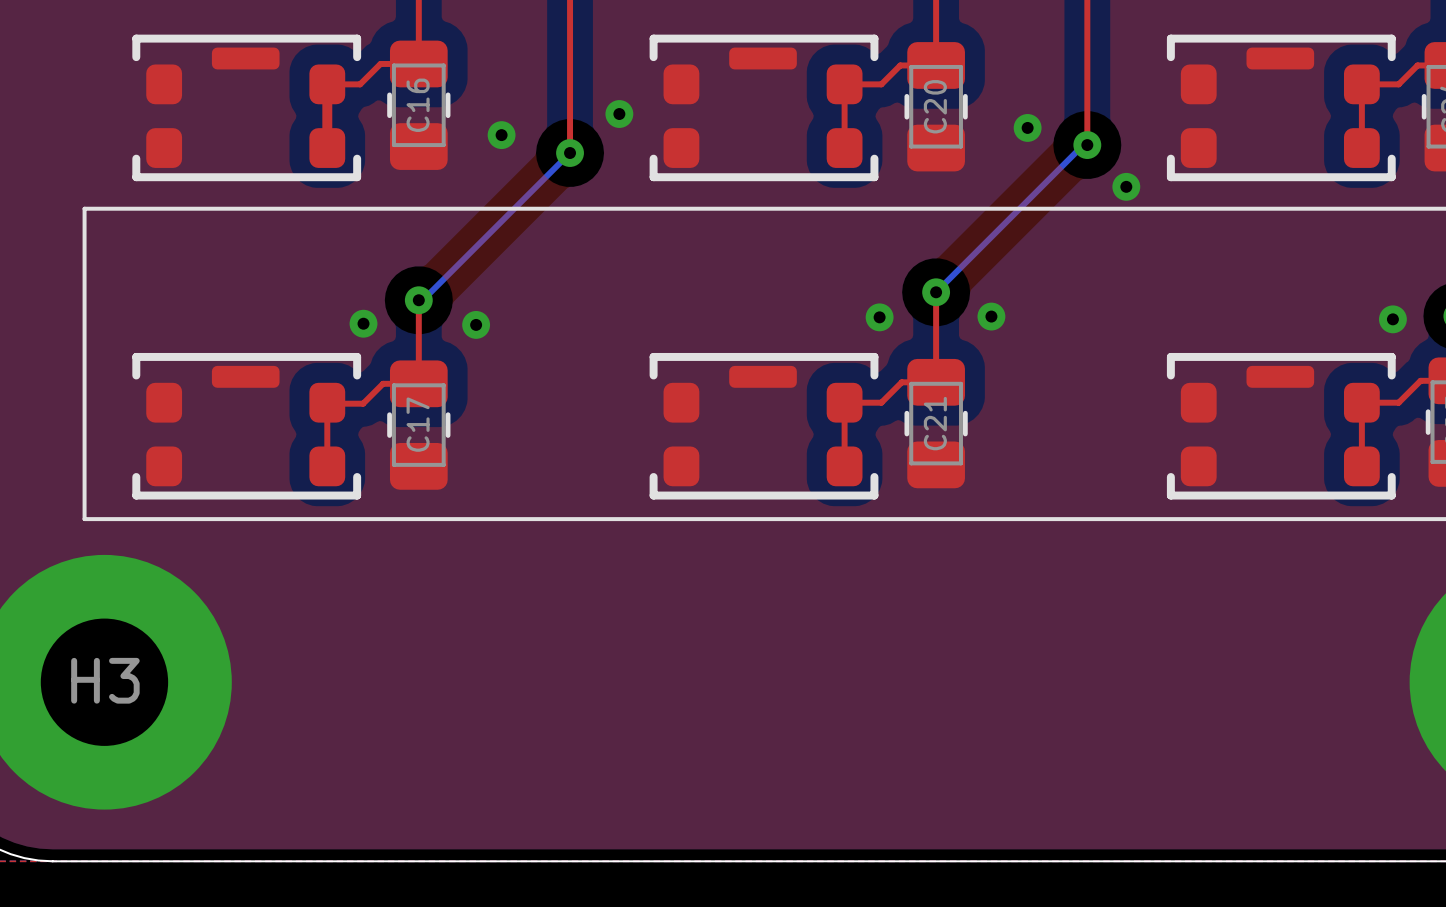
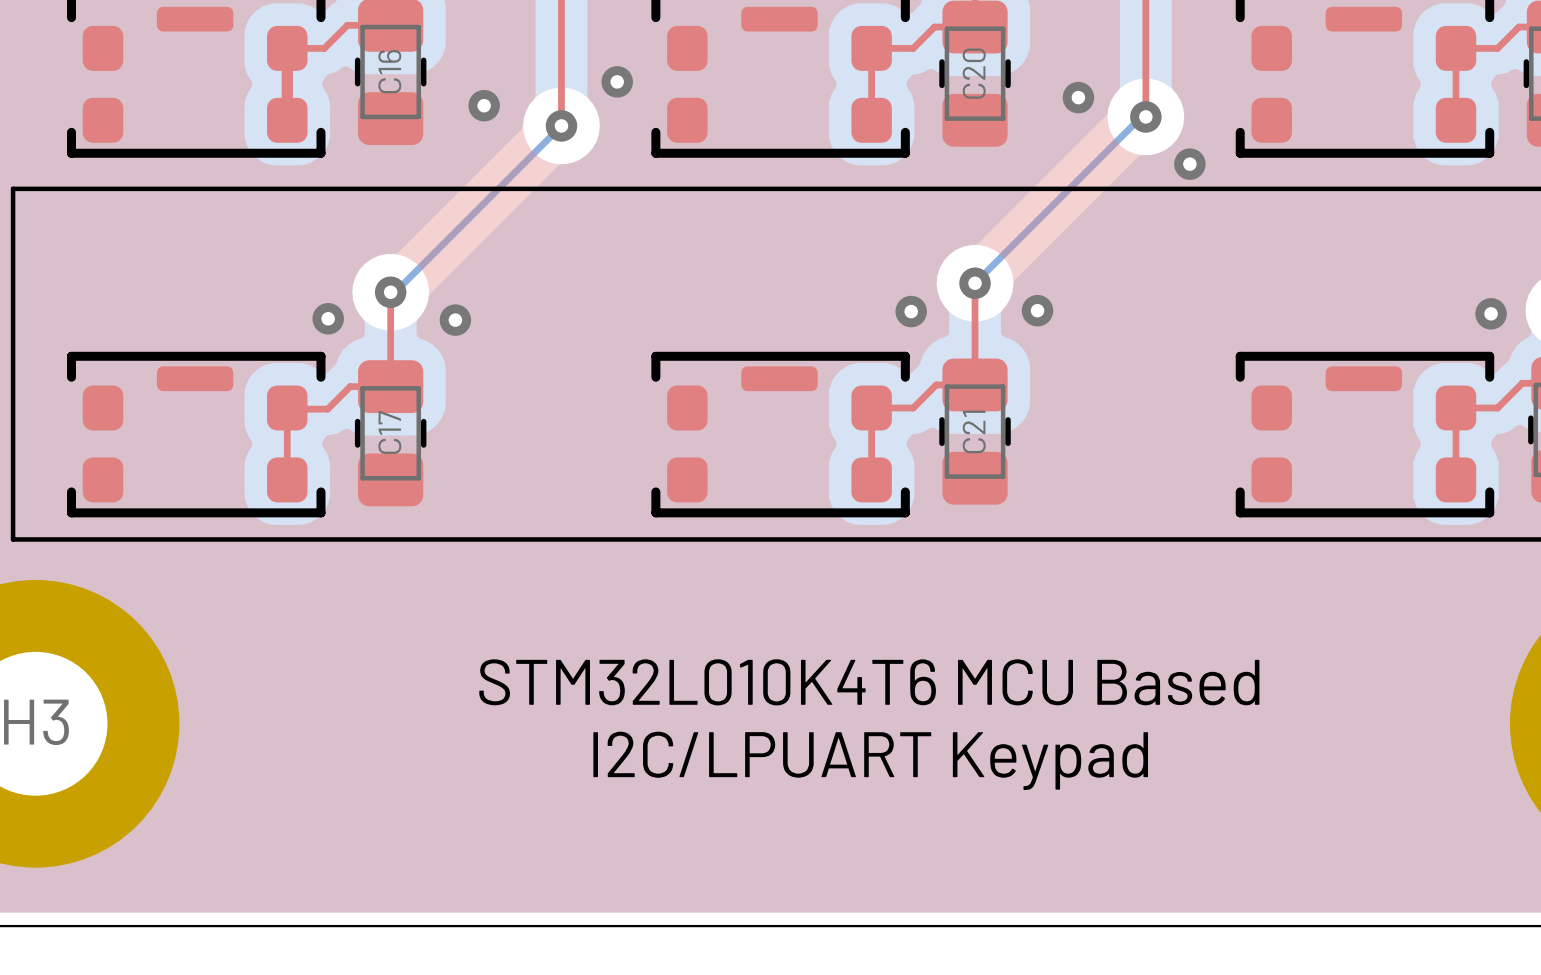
text: none -> STM32L010K4T6 MCU Based (869, 682)
text: none -> I2C/LPUART Keypad (870, 760)

